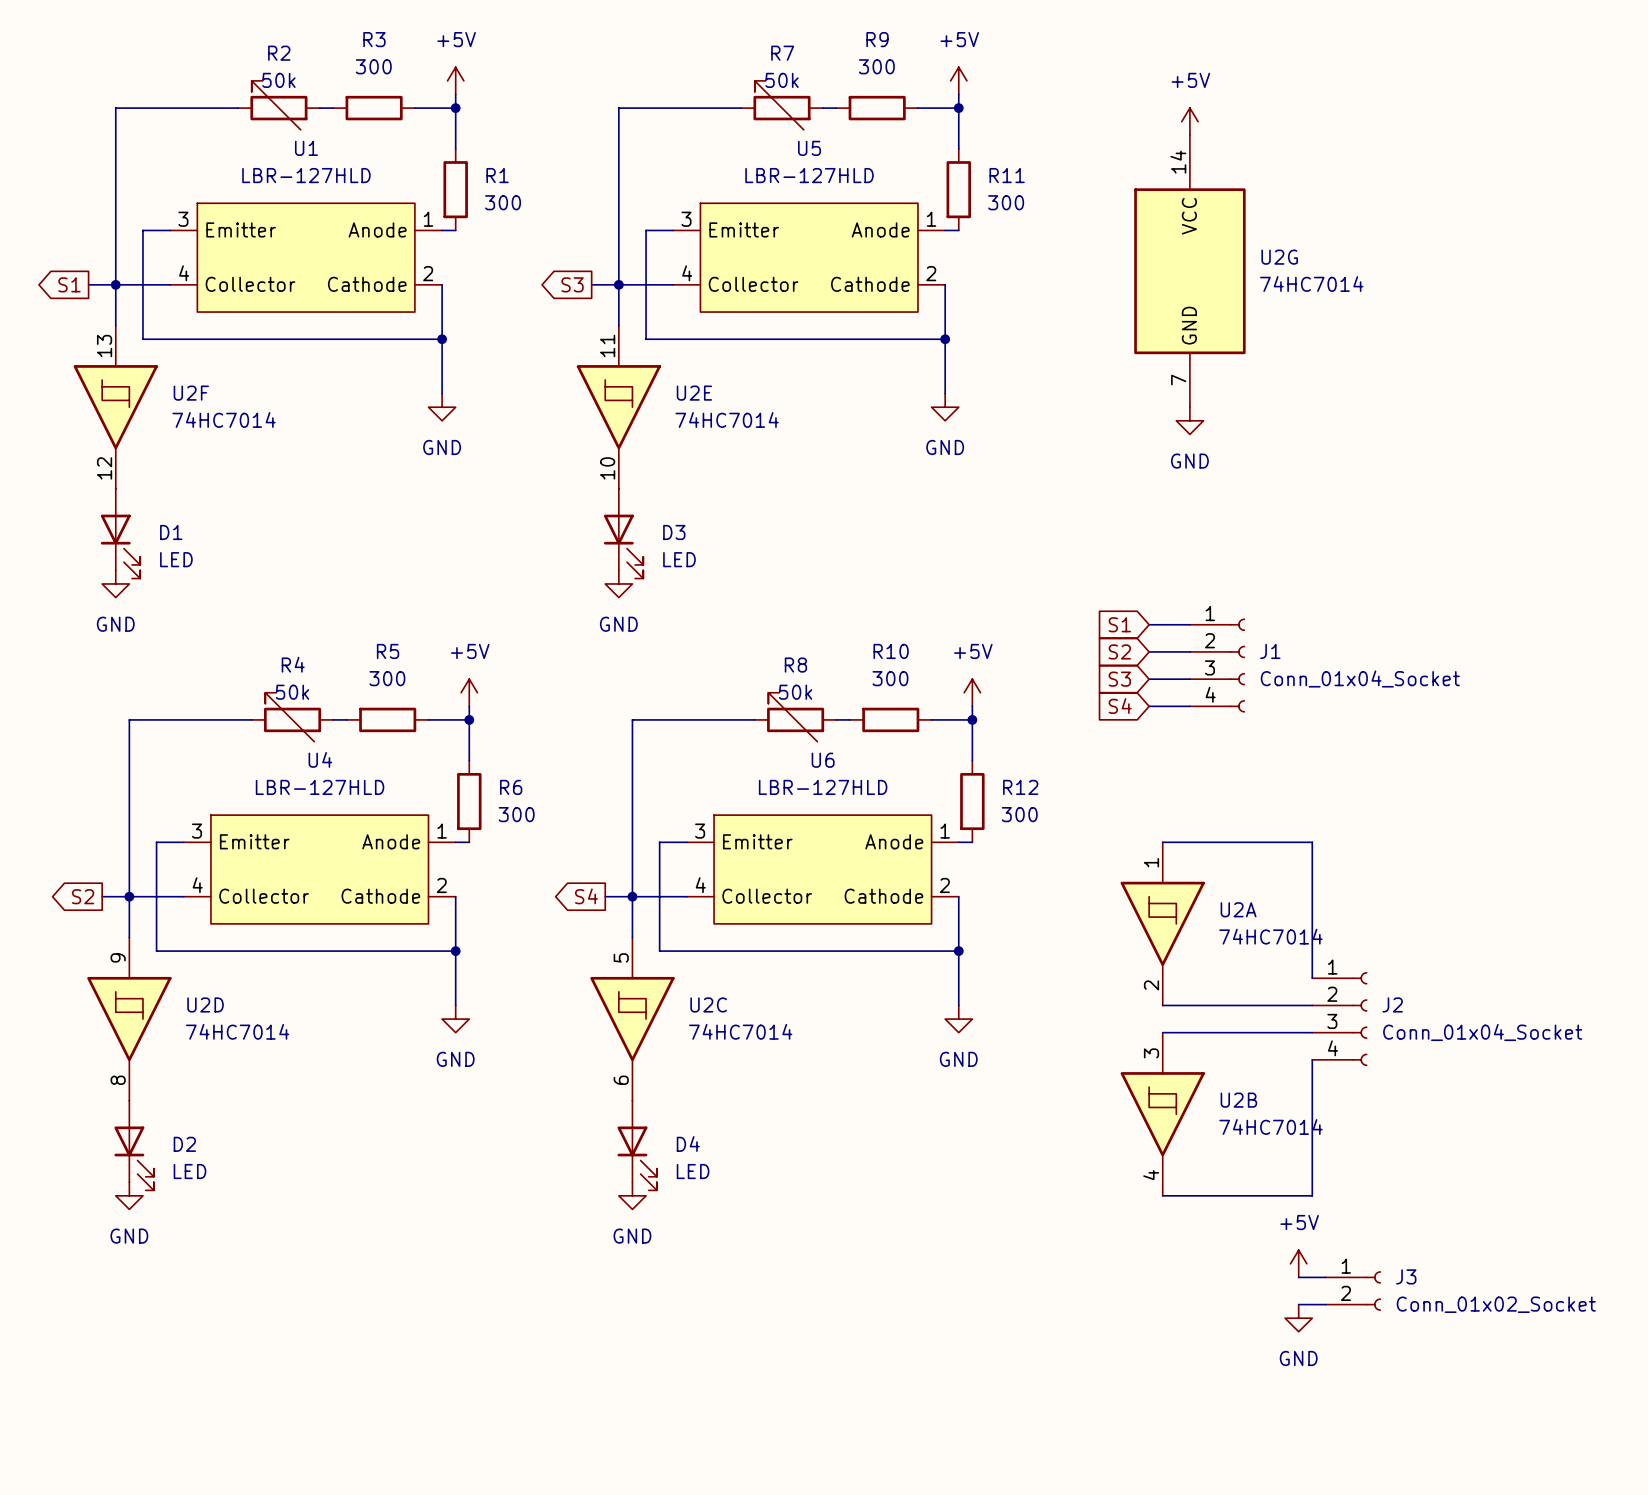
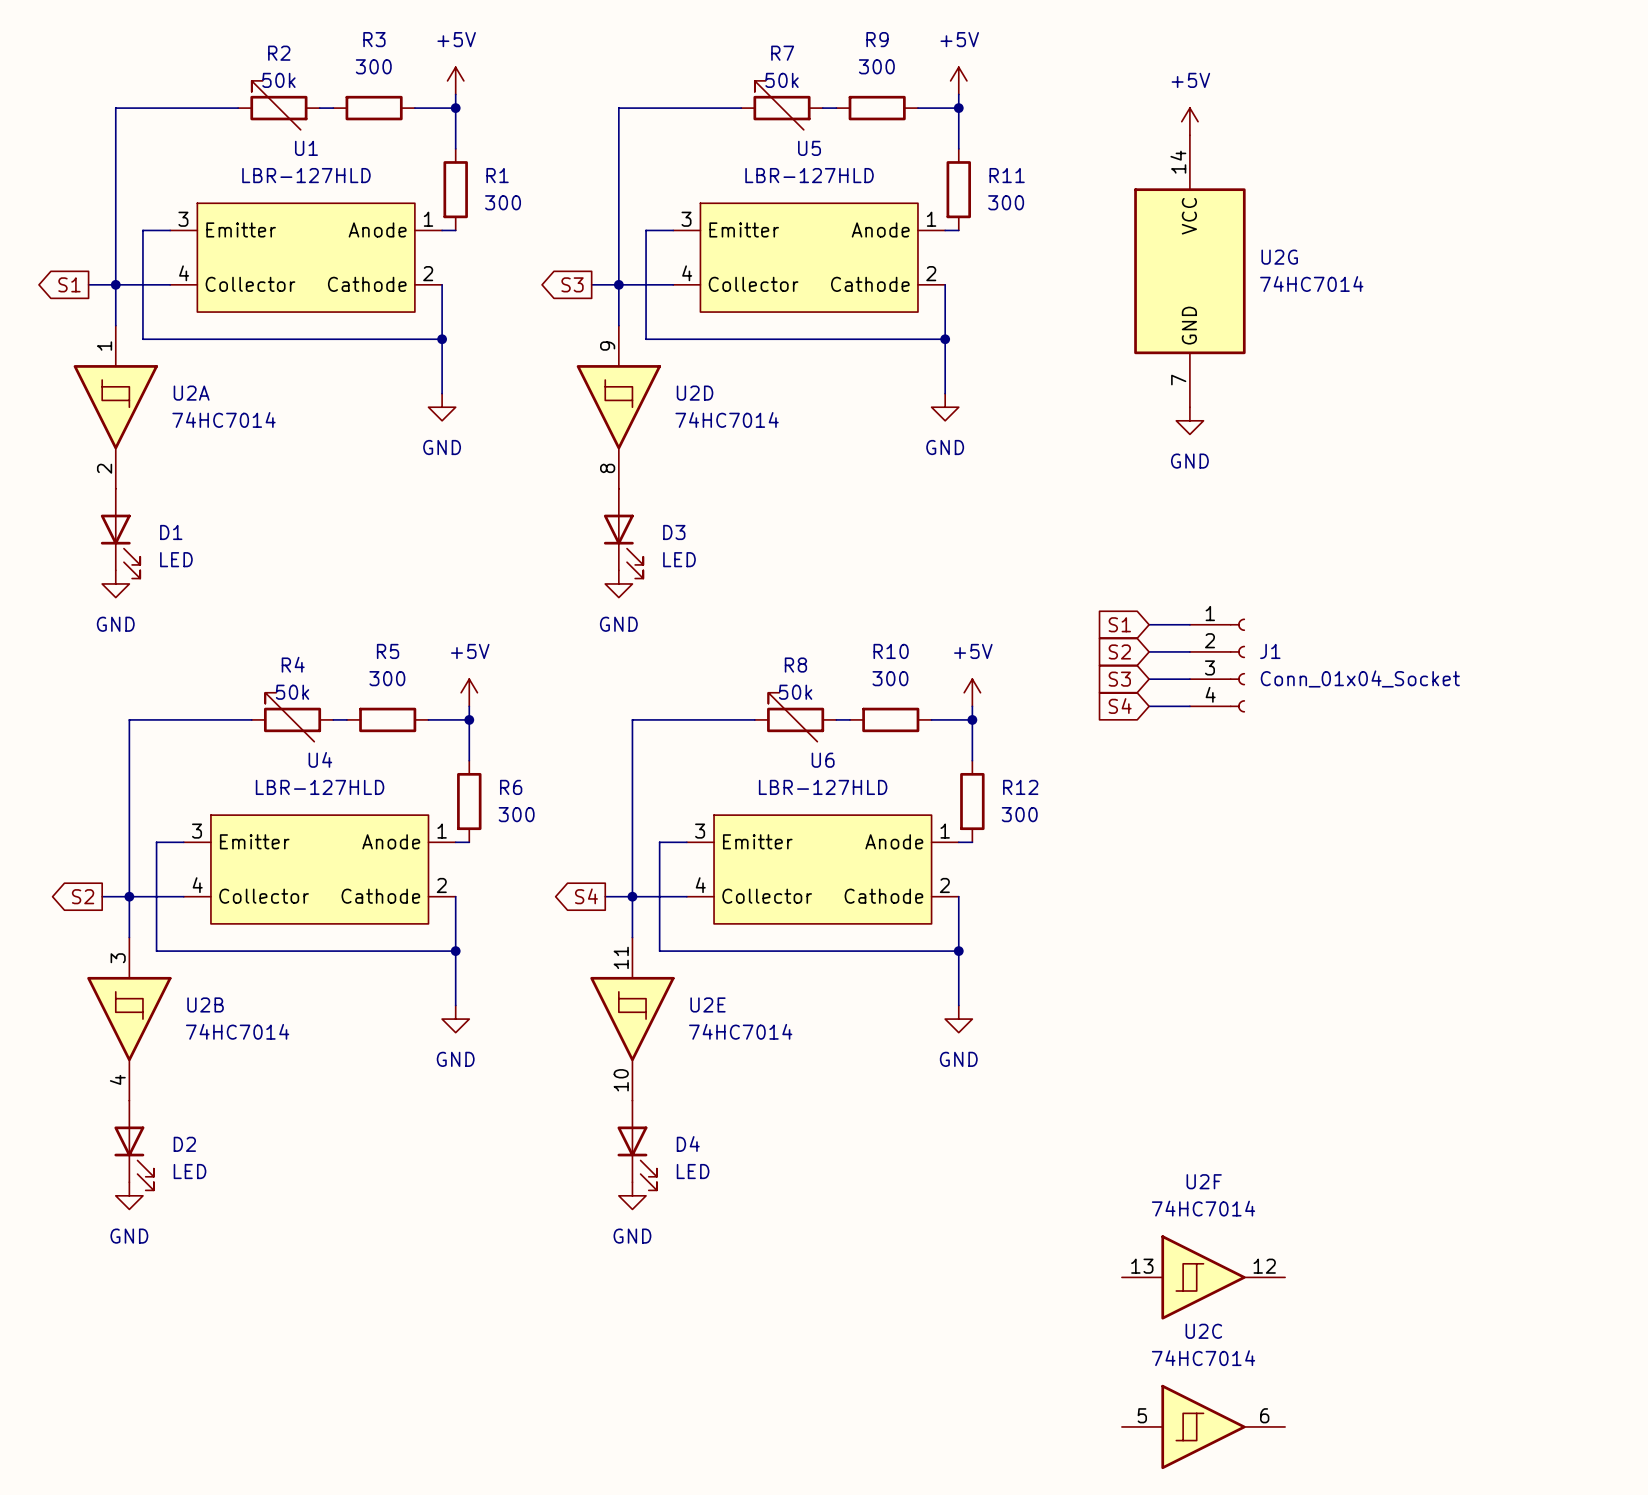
U2F name position: U2F (191, 393) -> U2F (1204, 1181)
U2F rotation: 0° (115, 407) -> 90° counterclockwise (1203, 1277)
U2F position: (115, 407) -> (1203, 1277)
U2E position: (618, 407) -> (632, 1019)
U2F value position: 74HC7014 (224, 419) -> 74HC7014 (1203, 1208)
wire: (1162, 842) (1312, 842) (1312, 978) -> none
U2A position: (1162, 923) -> (115, 407)
wire: (1162, 1005) (1312, 1005) -> none
U2D position: (129, 1019) -> (618, 407)
U2C rotation: 0° (632, 1019) -> 90° counterclockwise (1203, 1426)
U2C position: (632, 1019) -> (1203, 1426)
J2: Conn_01x04_Socket (1339, 1019) -> none
U2C value position: 74HC7014 (740, 1031) -> 74HC7014 (1203, 1358)
wire: (1162, 1032) (1312, 1032) -> none
wire: (1312, 1059) (1312, 1195) (1162, 1195) -> none
U2B position: (1162, 1114) -> (129, 1019)
power symbol: +5V (1298, 1263) -> none
wire: (1298, 1277) (1325, 1277) -> none
J3: Conn_01x02_Socket (1353, 1291) -> none
wire: (1298, 1304) (1325, 1304) -> none
power symbol: GND (1298, 1318) -> none

